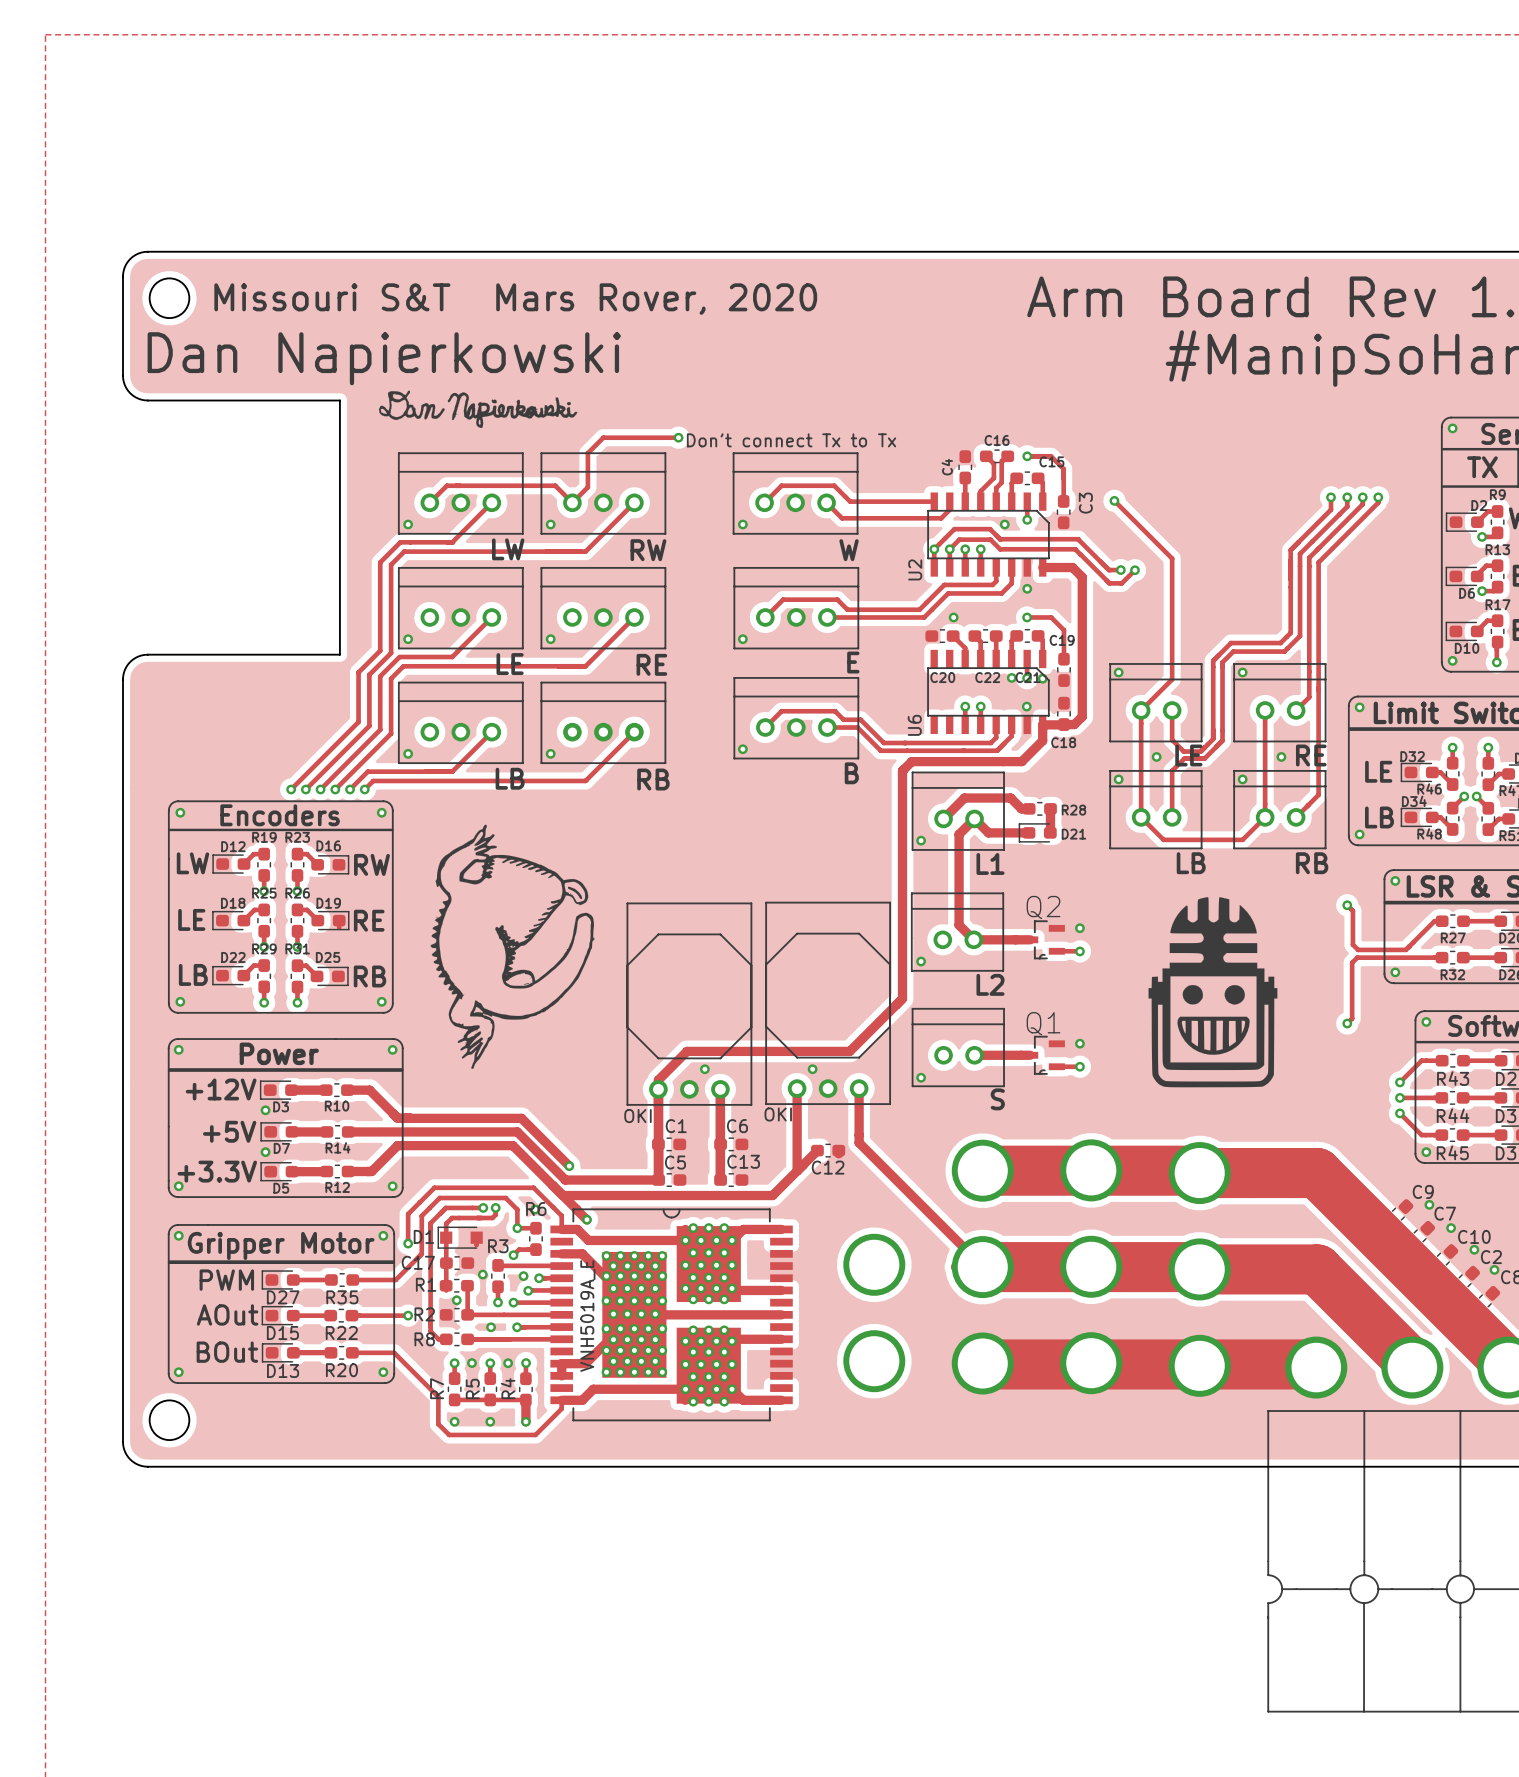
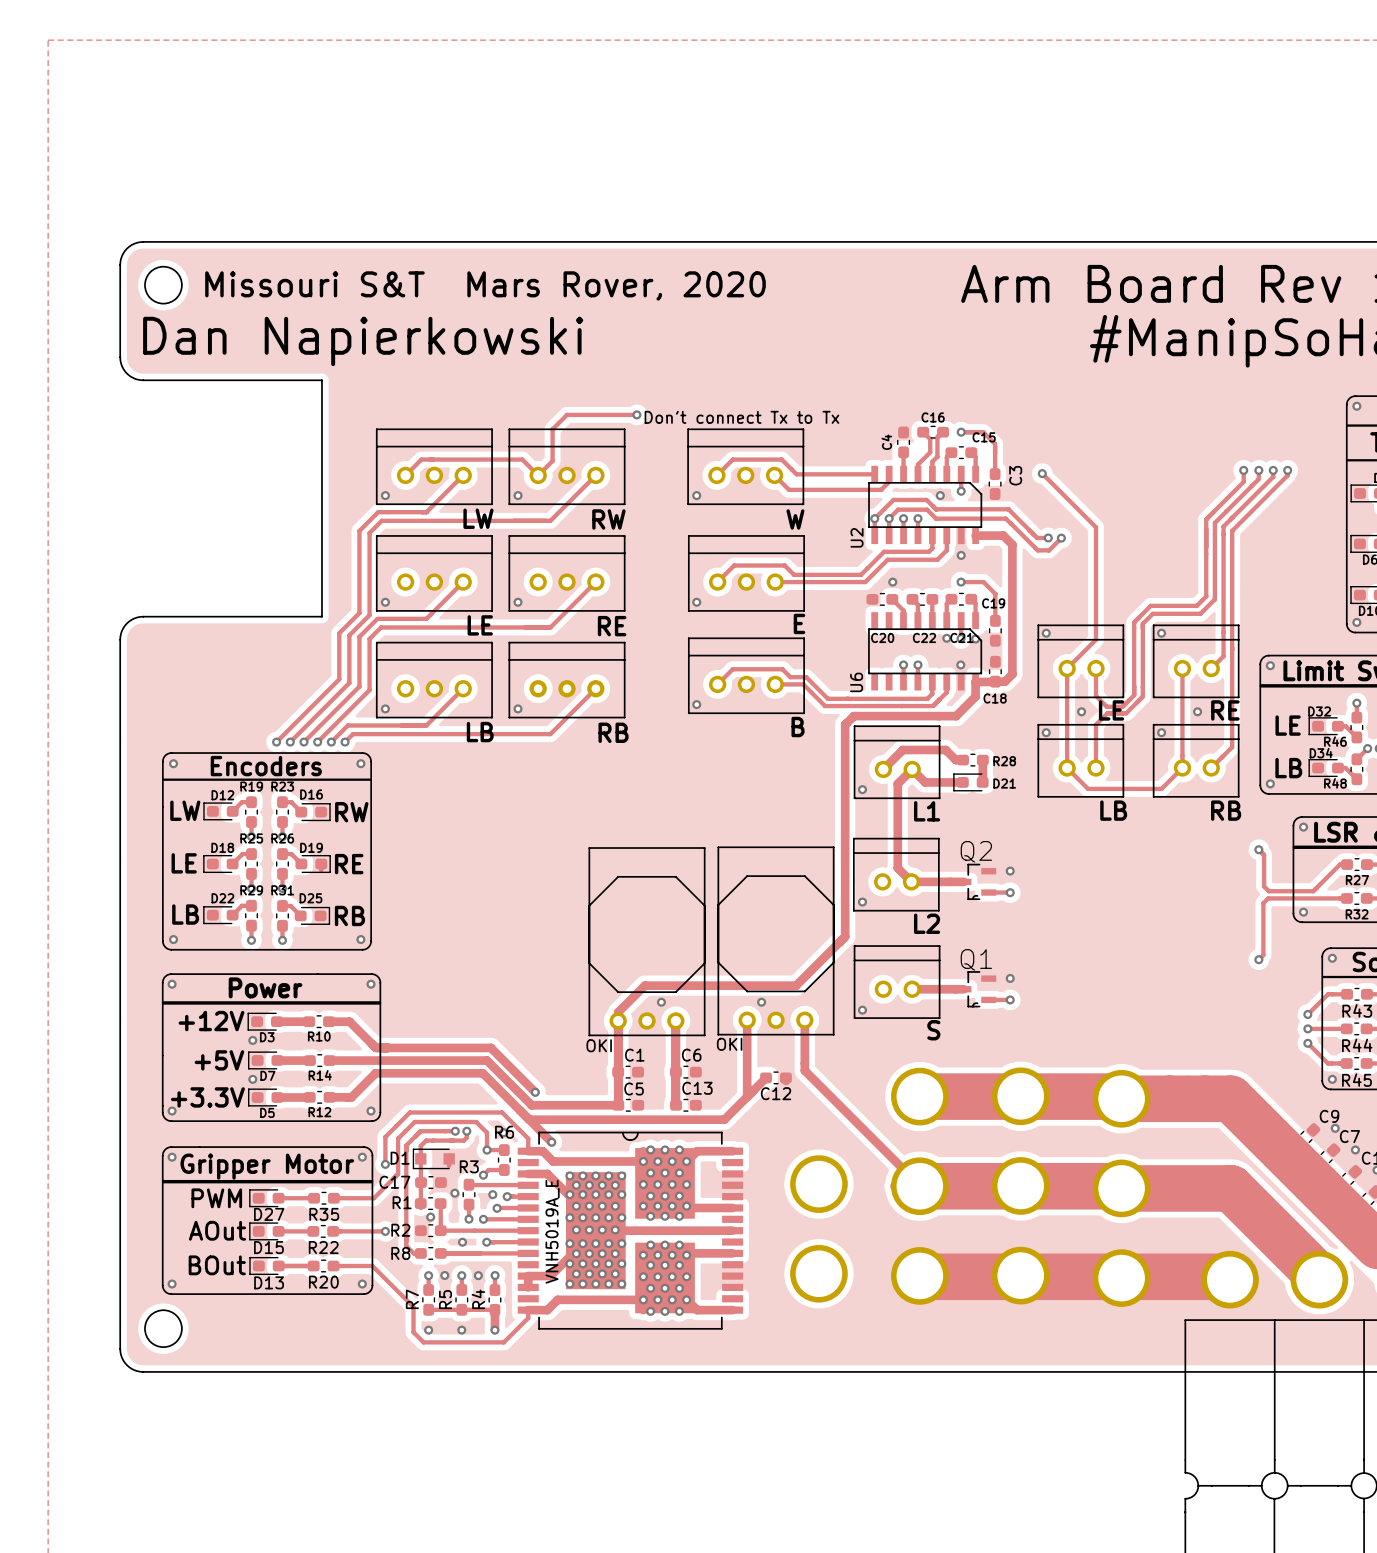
drawing: [379, 390, 578, 429] -> none
drawing: [430, 824, 595, 1069] -> none
drawing: [1148, 897, 1278, 1088] -> none

